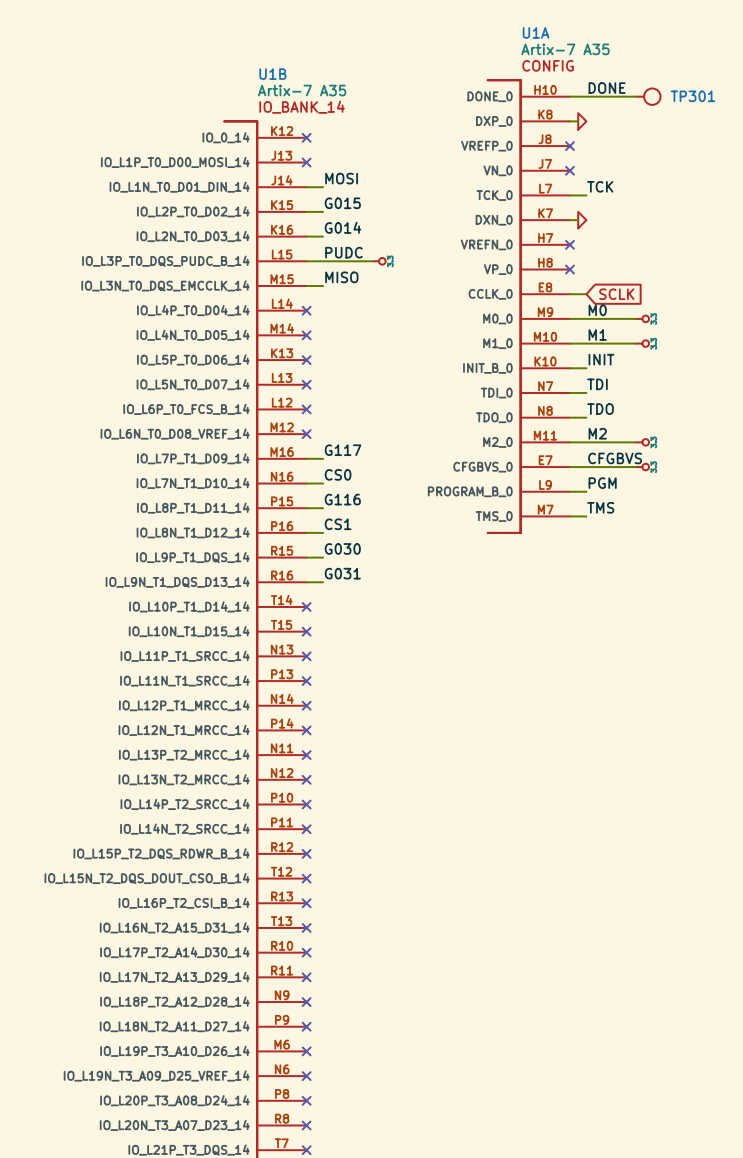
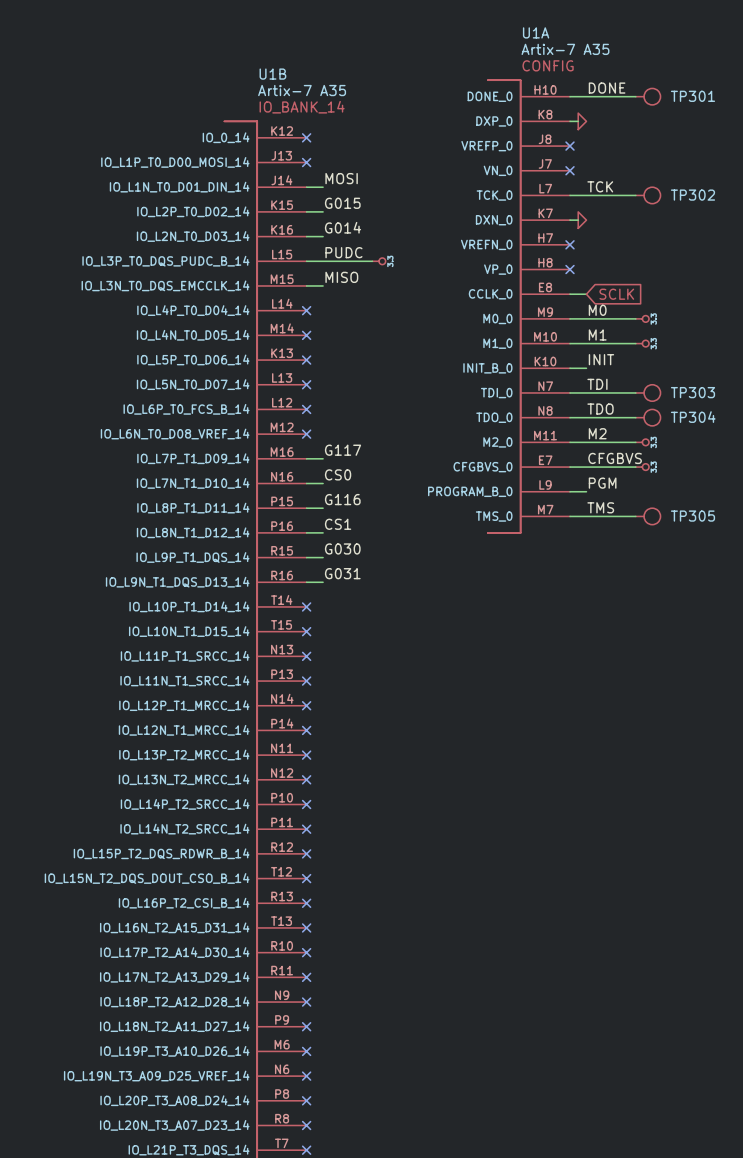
wire: none -> (586, 195) (635, 195)
TP302: none -> (648, 195)
wire: none -> (586, 392) (635, 392)
TP303: none -> (648, 392)
wire: none -> (586, 417) (635, 417)
TP304: none -> (648, 417)
wire: none -> (586, 516) (635, 516)
TP305: none -> (648, 516)

